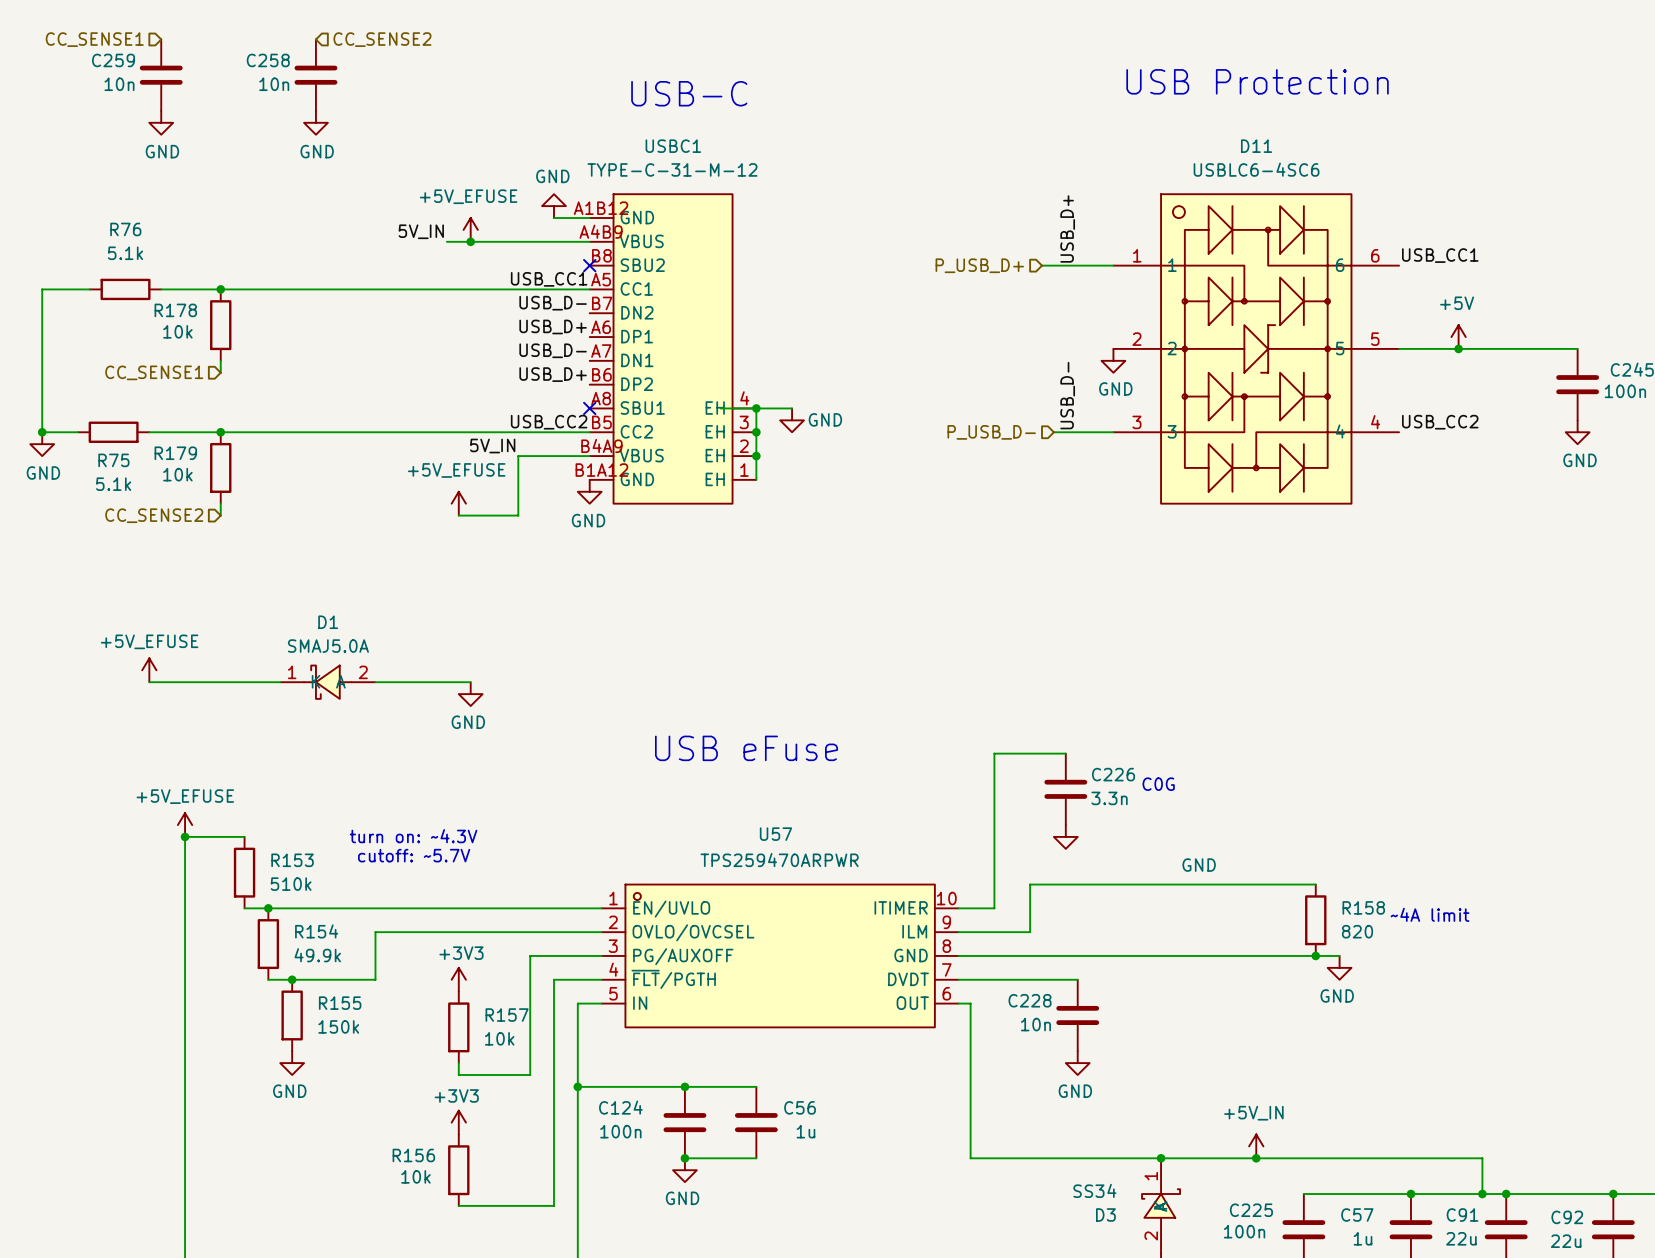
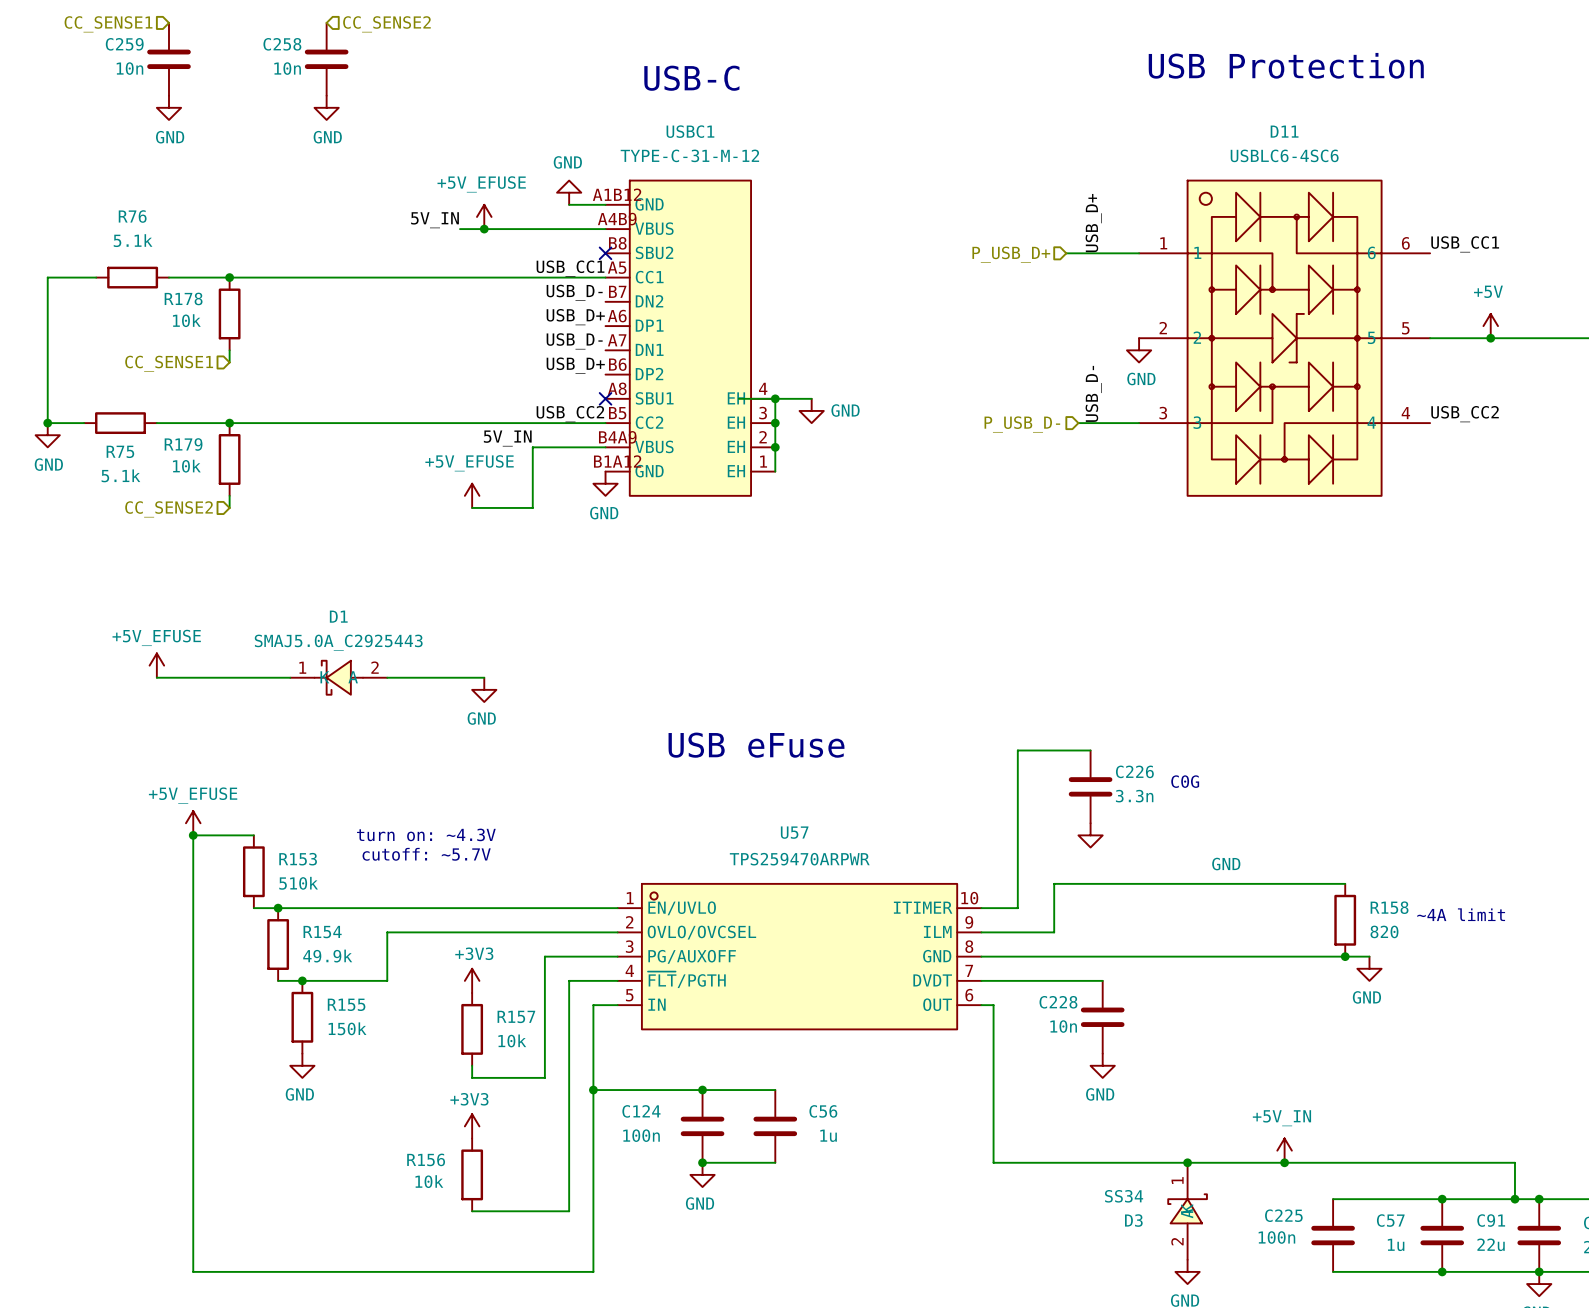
D1 value: SMAJ5.0A (328, 646) -> SMAJ5.0A_C2925443 (338, 642)

